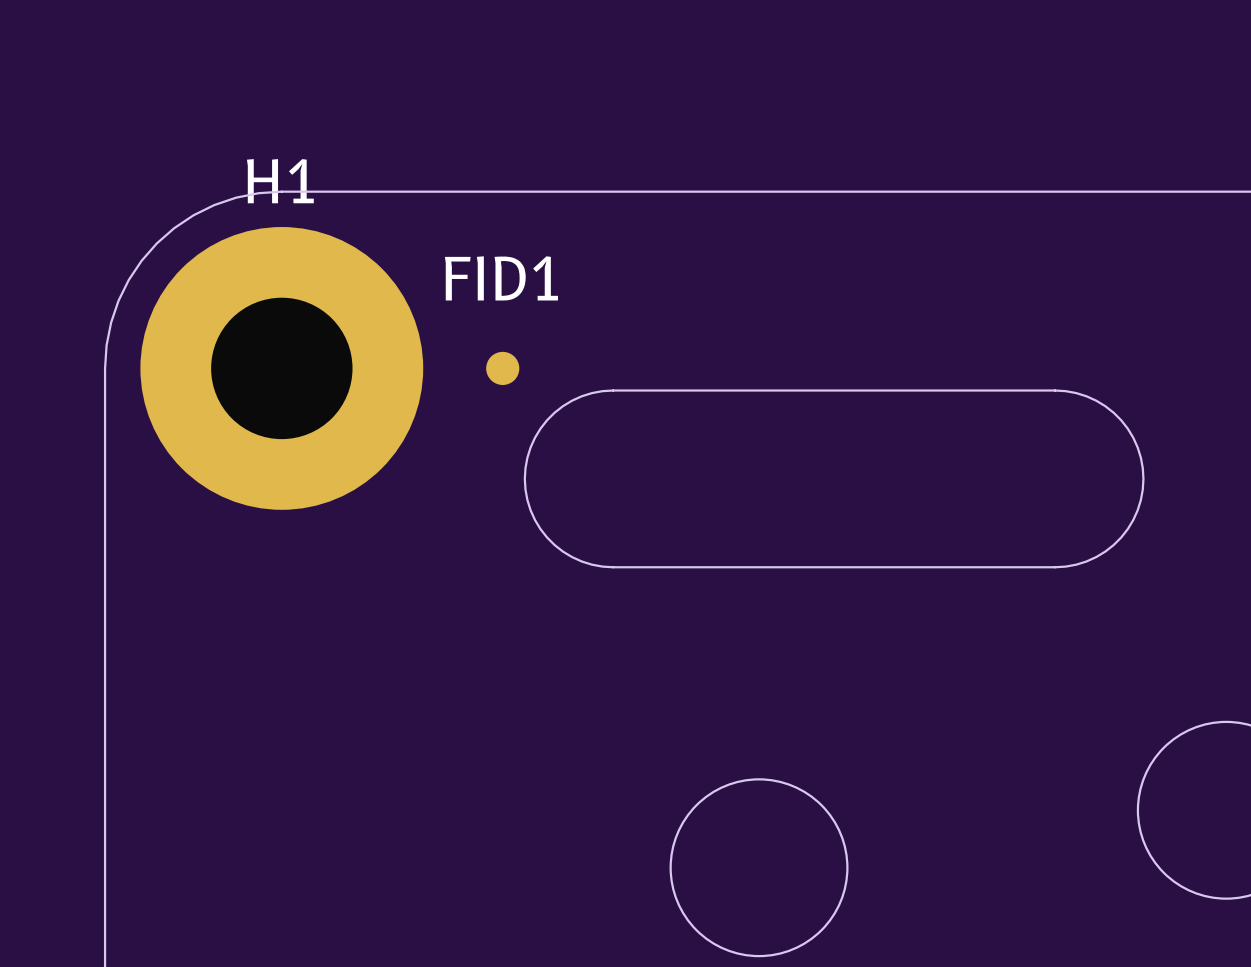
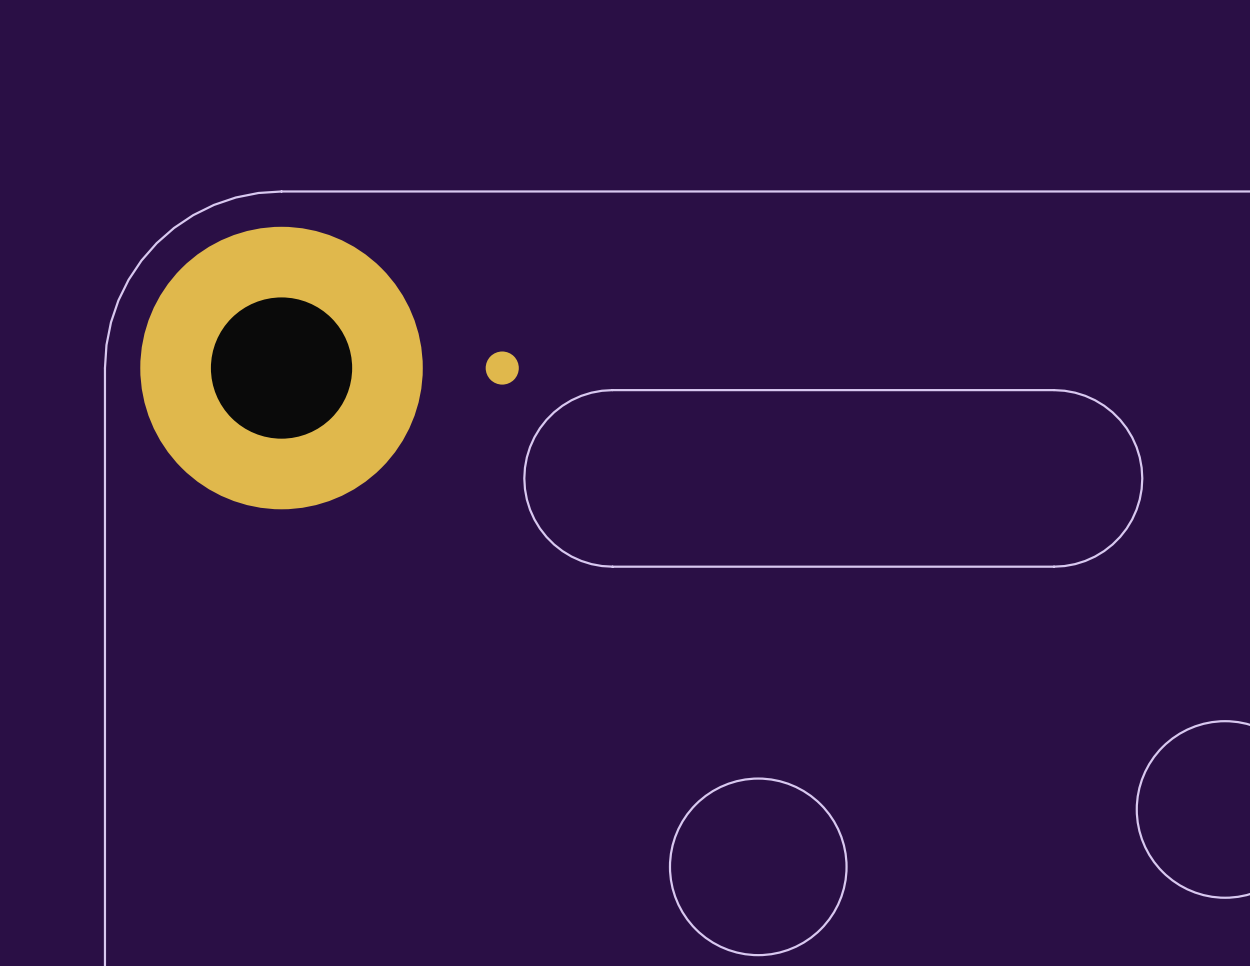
H1 name: H1 (280, 181) -> none
FID1 name: FID1 (501, 278) -> none

